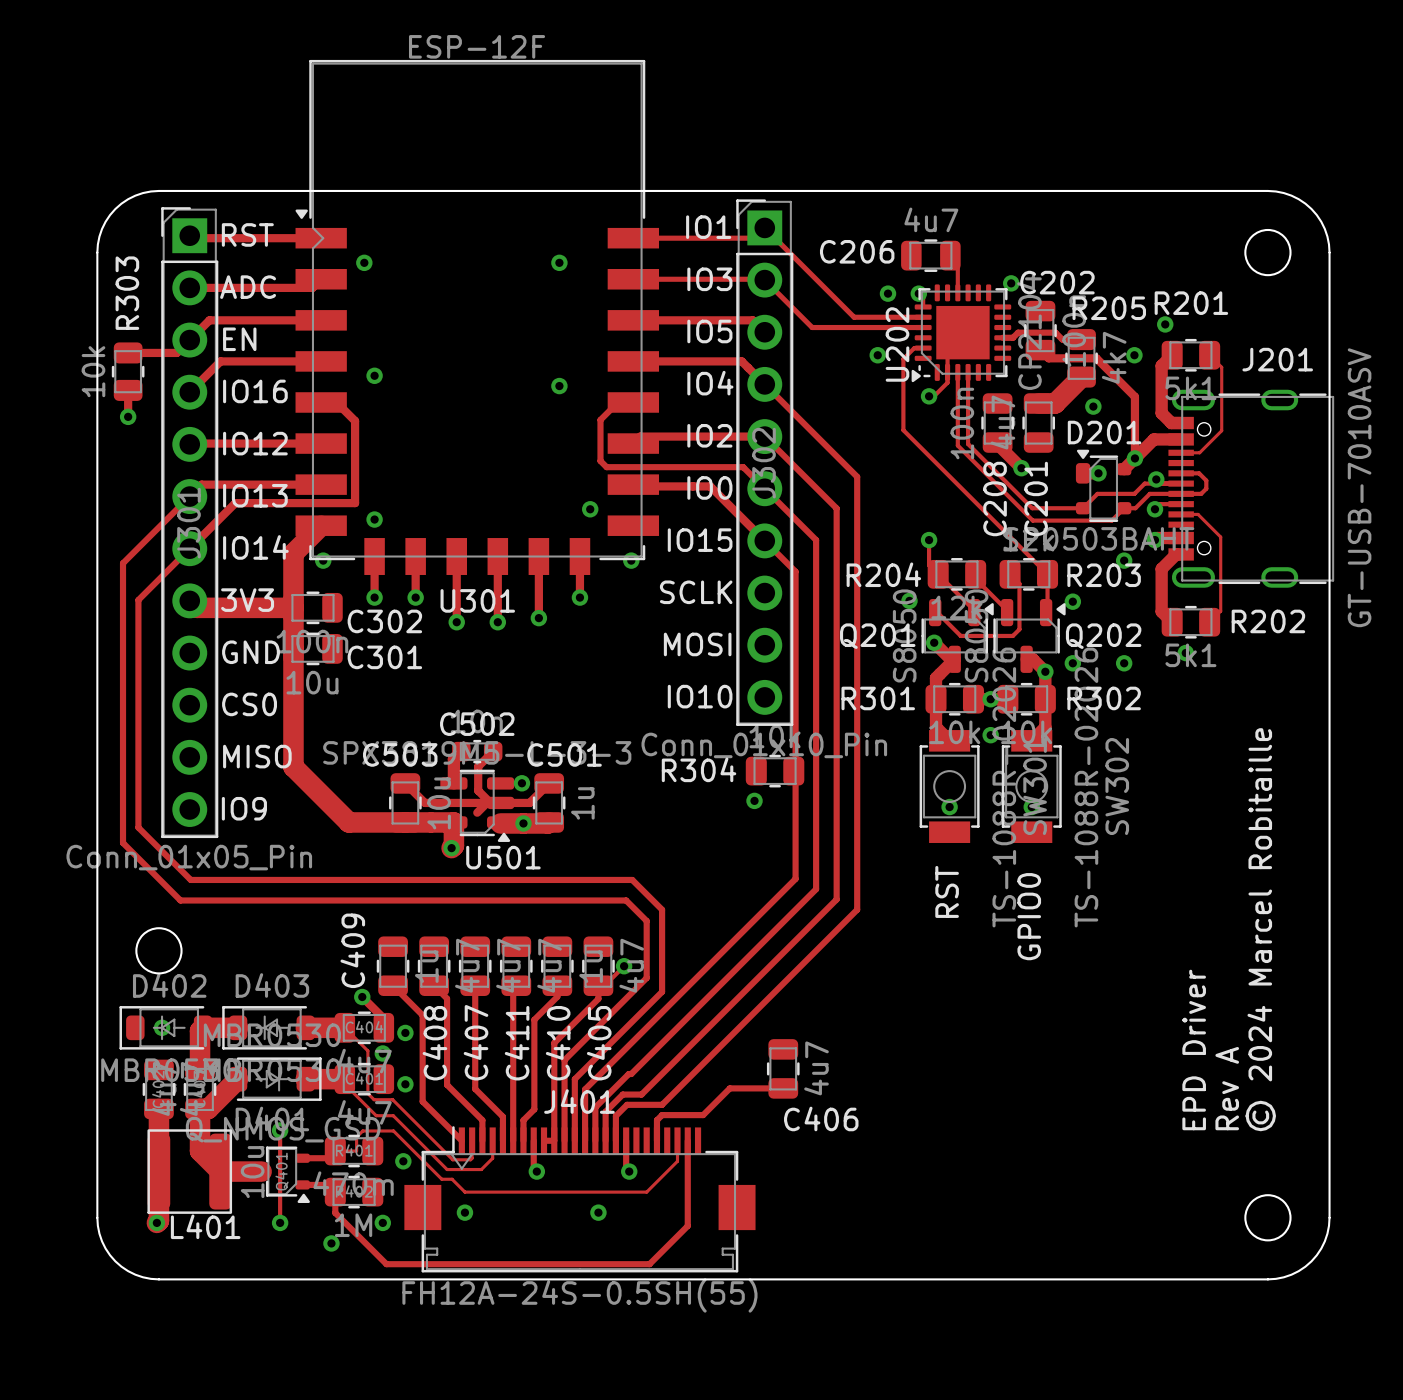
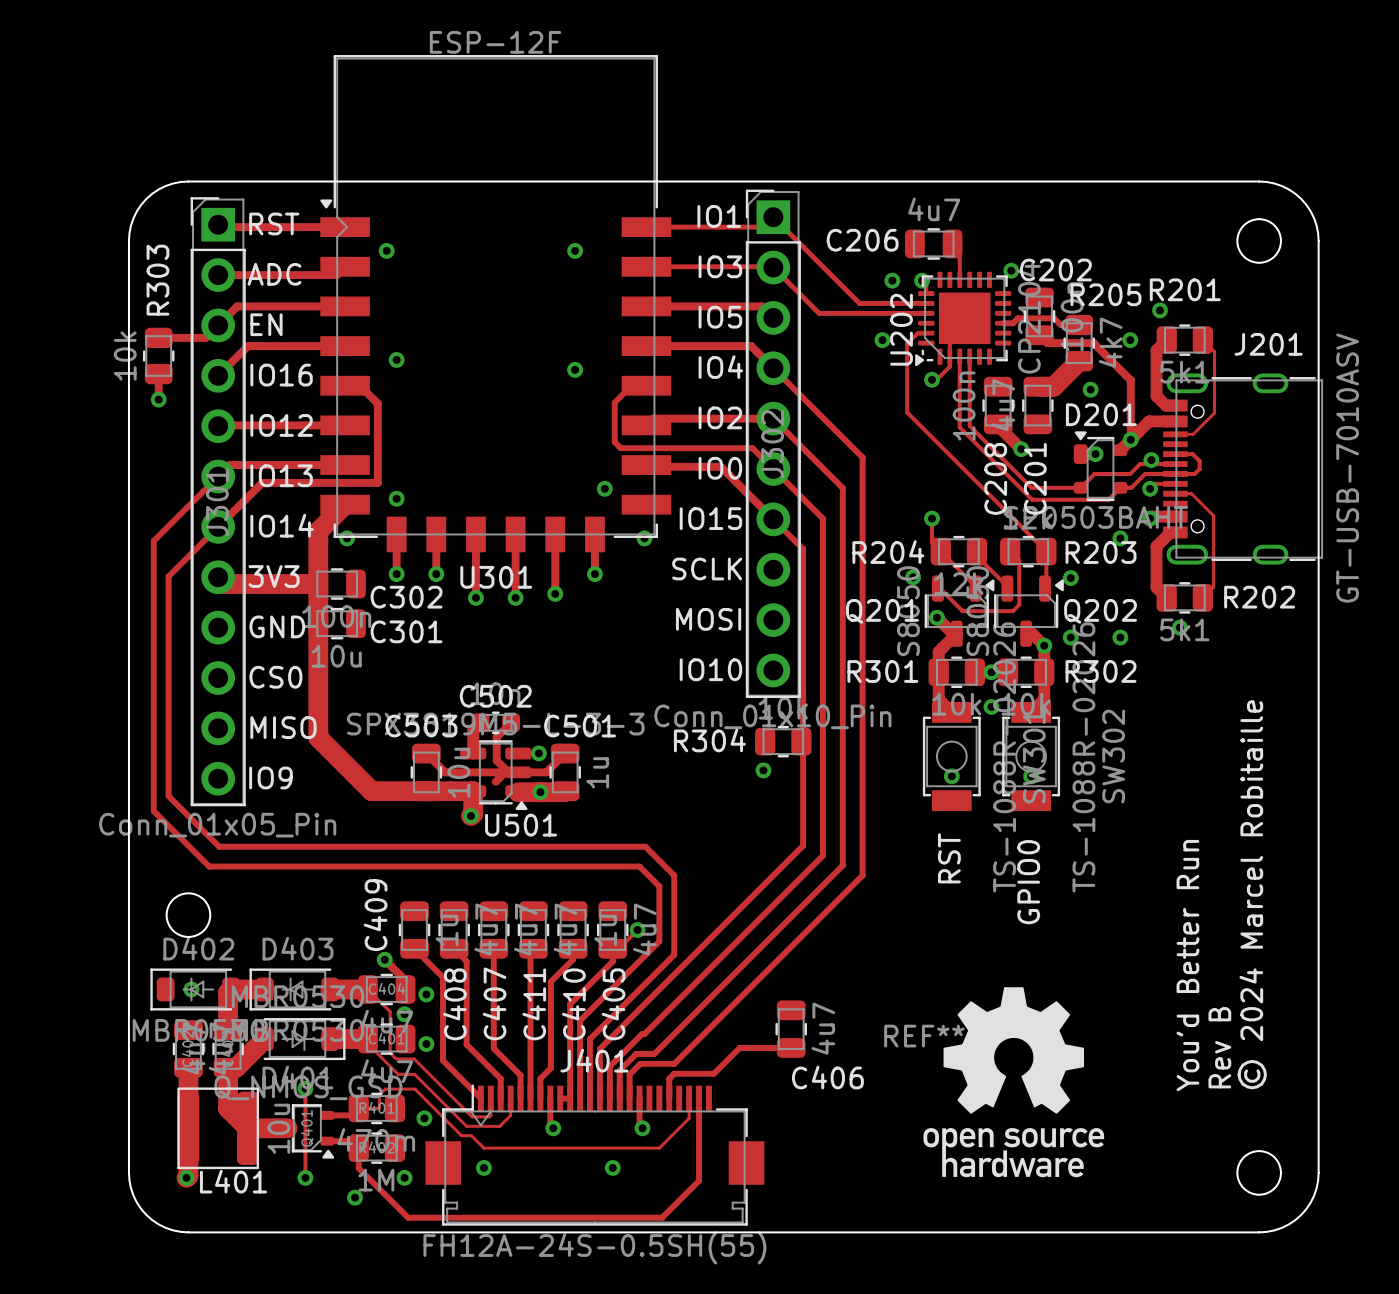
text: EPD Driver (1194, 1049) -> You'd Better Run (1187, 965)
text: Rev A (1227, 1088) -> Rev B (1219, 1047)
REF**: none -> (1013, 1082)

